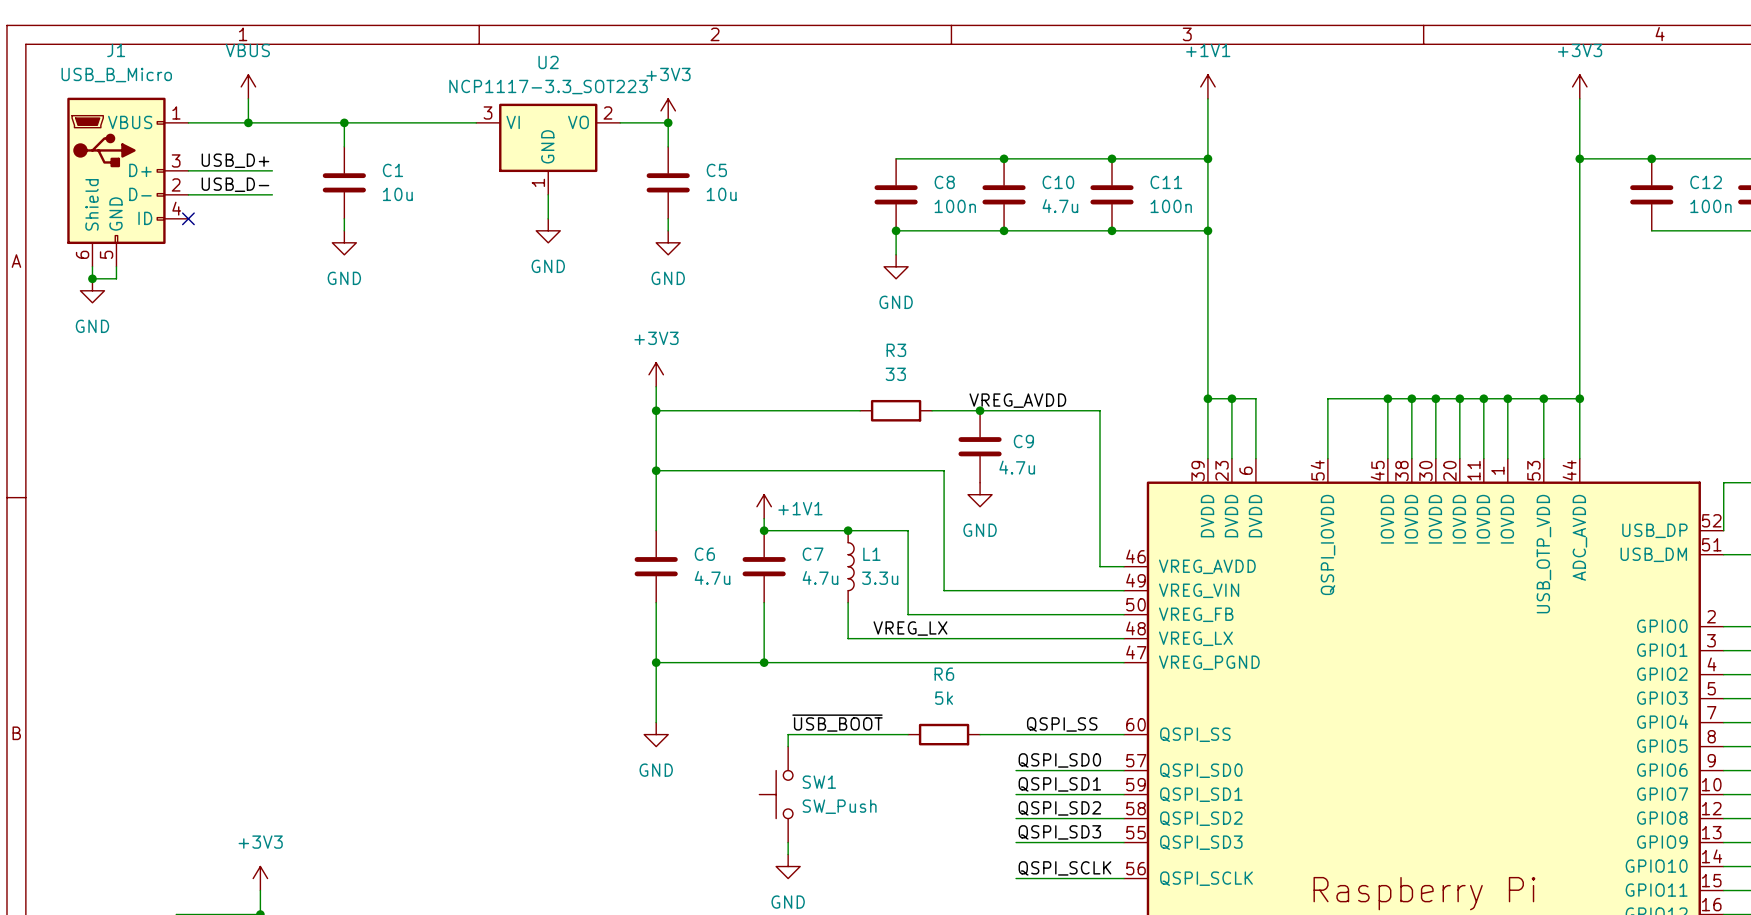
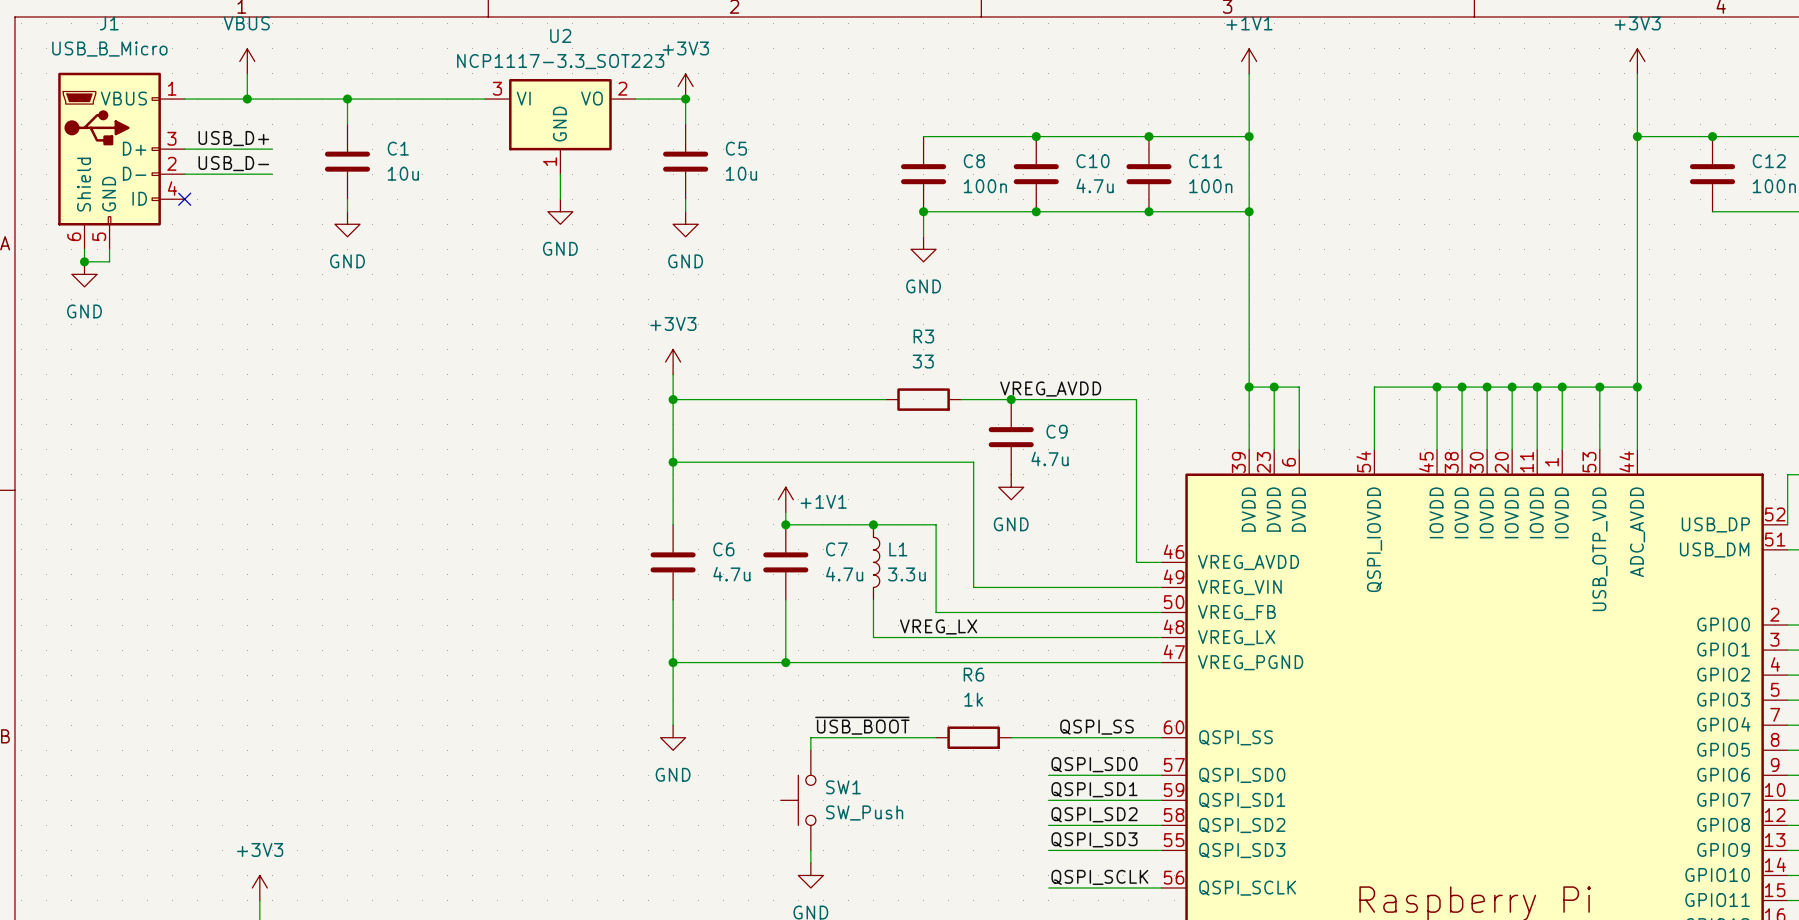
R6 value: 5k (944, 698) -> 1k (973, 699)

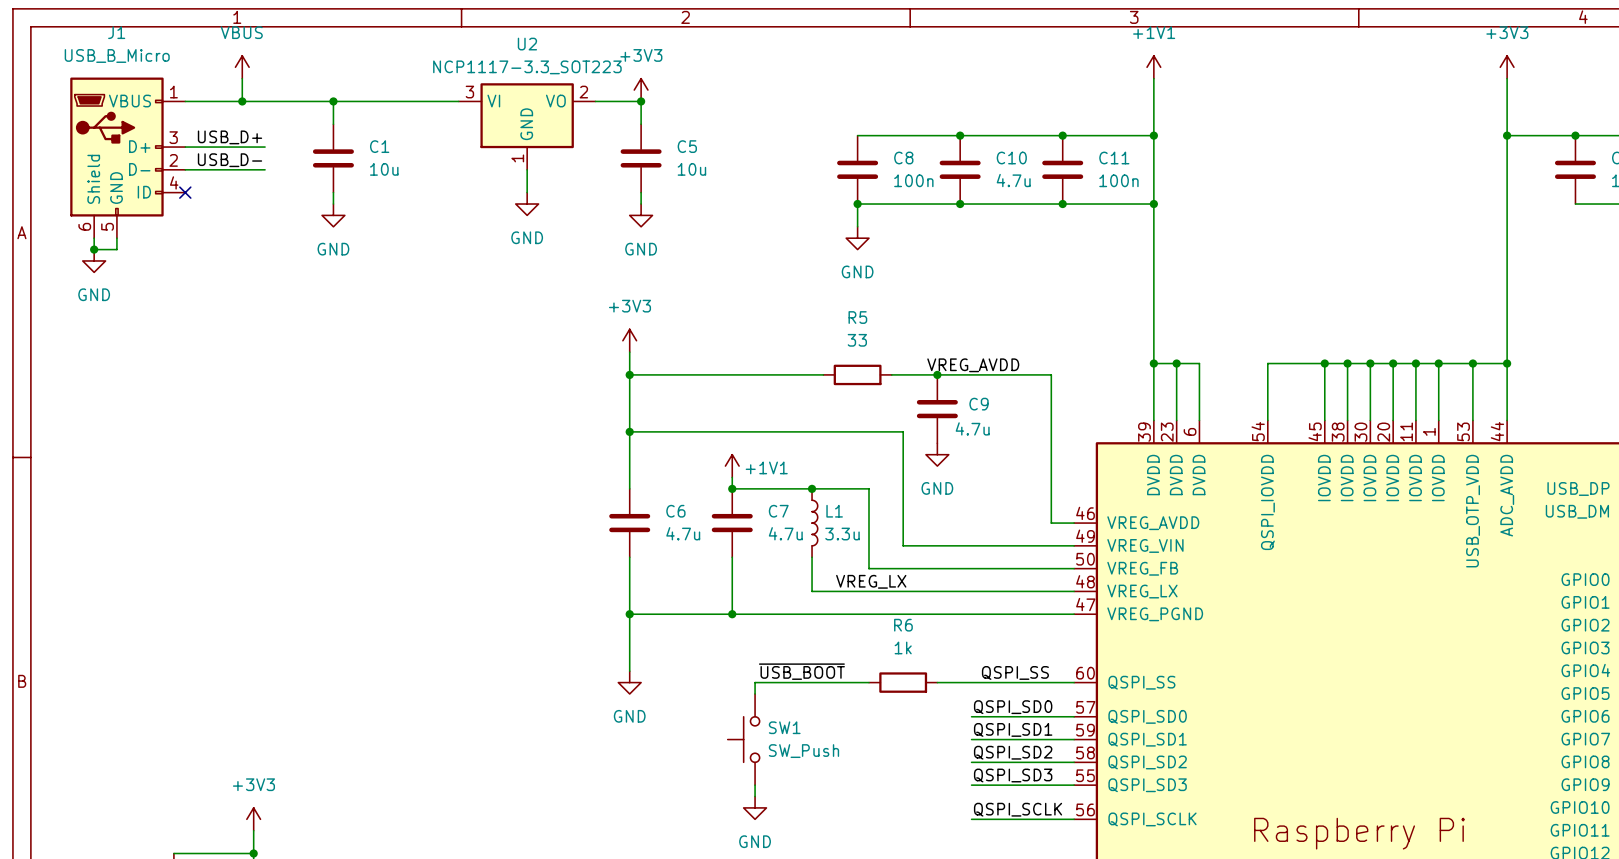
R3 name: R3 (923, 336) -> R5 (857, 317)

